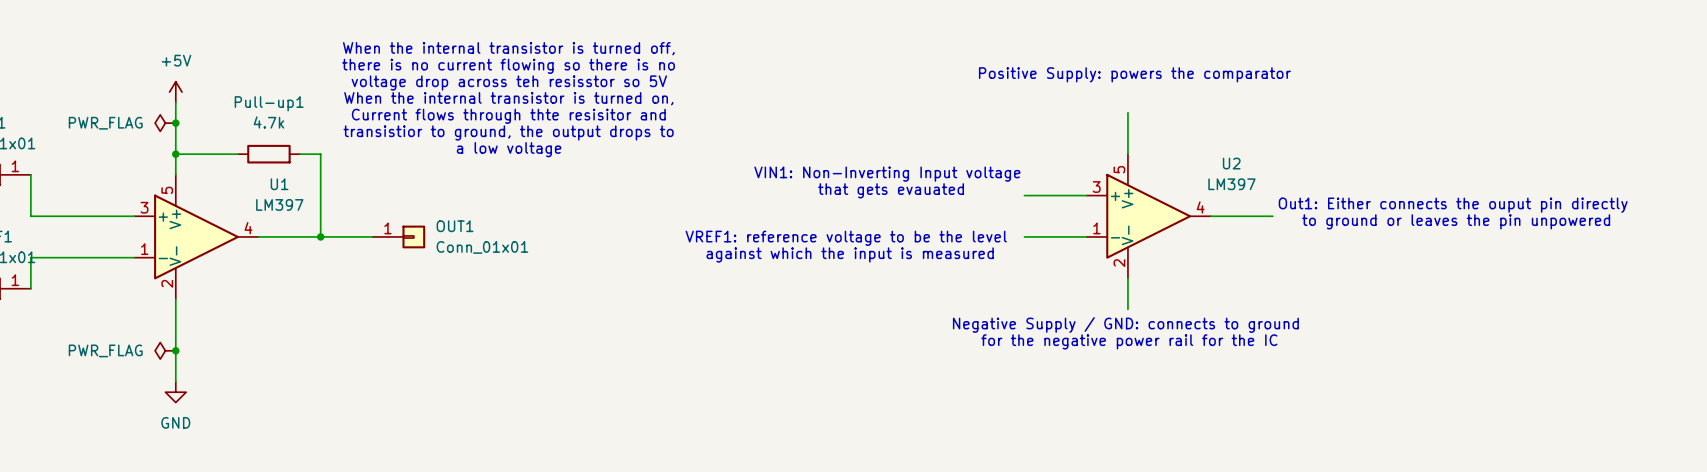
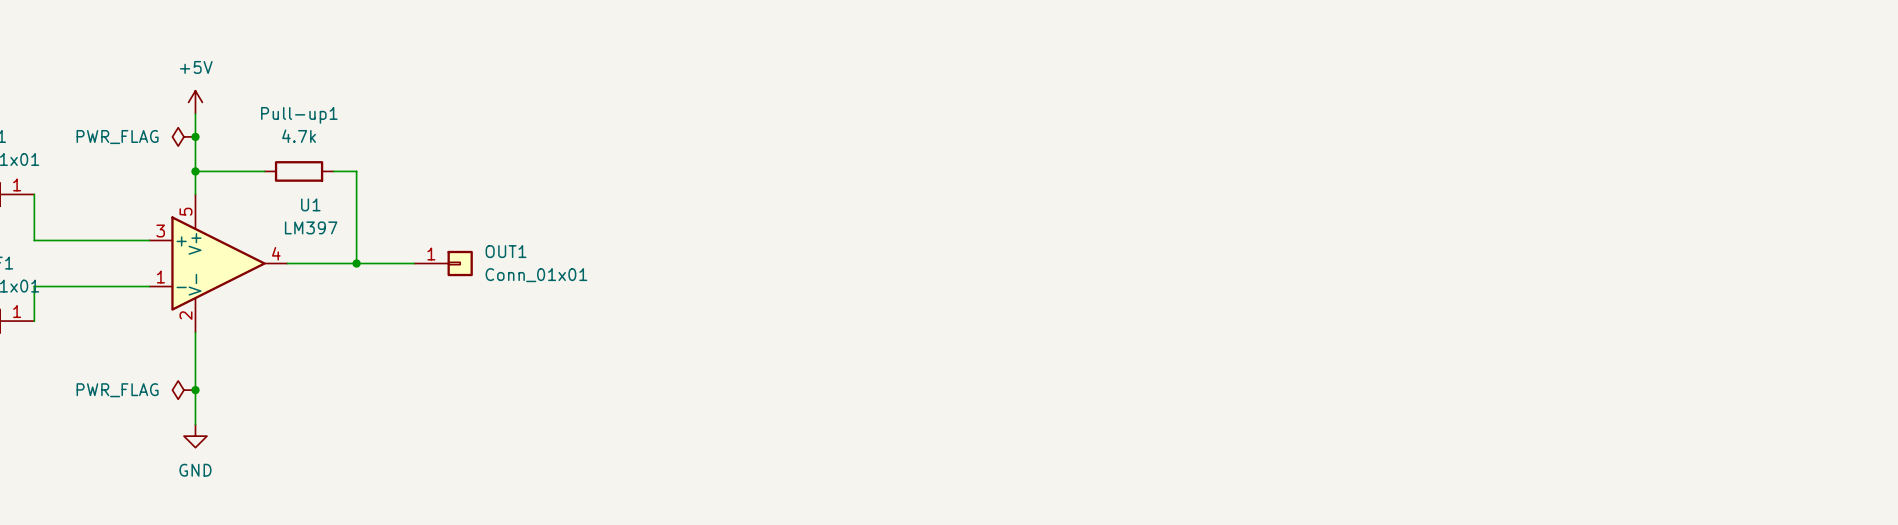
text: When the internal transistor is turned off, (508, 48) -> none
text: there is no current flowing so there is no (508, 66) -> none
text: Positive Supply: powers the comparator (1134, 74) -> none
text: voltage drop across teh resisstor so 5V (509, 82) -> none
text: When the internal transistor is turned on, (508, 98) -> none
wire: (1127, 112) (1127, 154) -> none
text: Current flows through thte resisitor and (508, 116) -> none
text: transistior to ground, the output drops to (508, 132) -> none
text: a low voltage (509, 149) -> none
text: VIN1: Non-Inverting Input voltage (887, 174) -> none
text: that gets evauated (891, 190) -> none
wire: (1024, 195) (1086, 195) -> none
text: Out1: Either connects the ouput pin directly (1453, 205) -> none
U2: LM397 (1148, 216) -> none
wire: (1210, 216) (1272, 216) -> none
text: to ground or leaves the pin unpowered (1456, 221) -> none
wire: (1024, 236) (1086, 236) -> none
text: VREF1: reference voltage to be the level (846, 238) -> none
text: against which the input is measured (850, 254) -> none
wire: (1127, 278) (1127, 309) -> none
text: Negative Supply / GND: connects to ground (1125, 324) -> none
text: for the negative power rail for the IC (1129, 341) -> none

